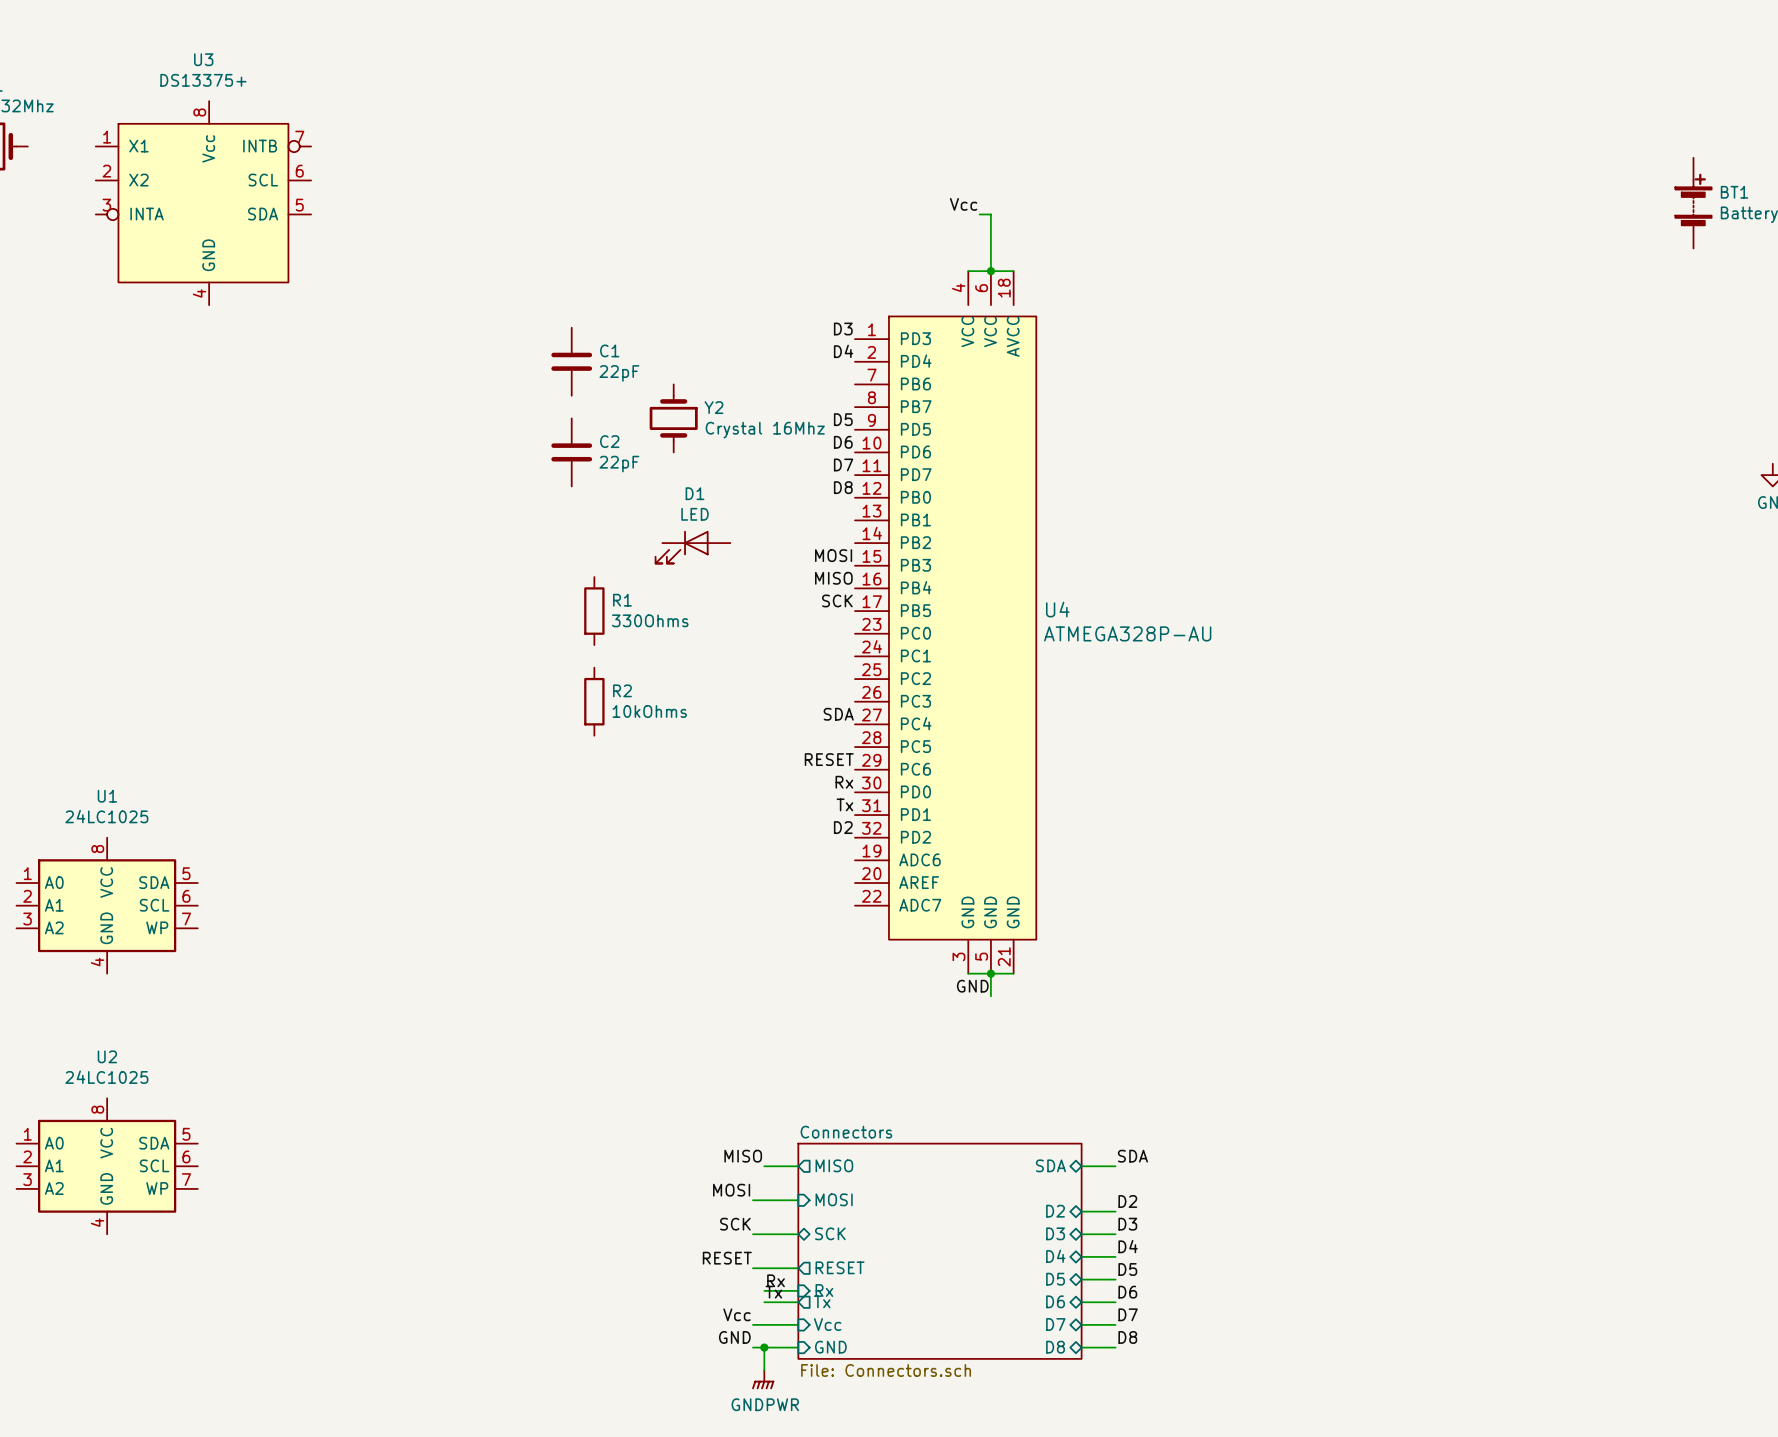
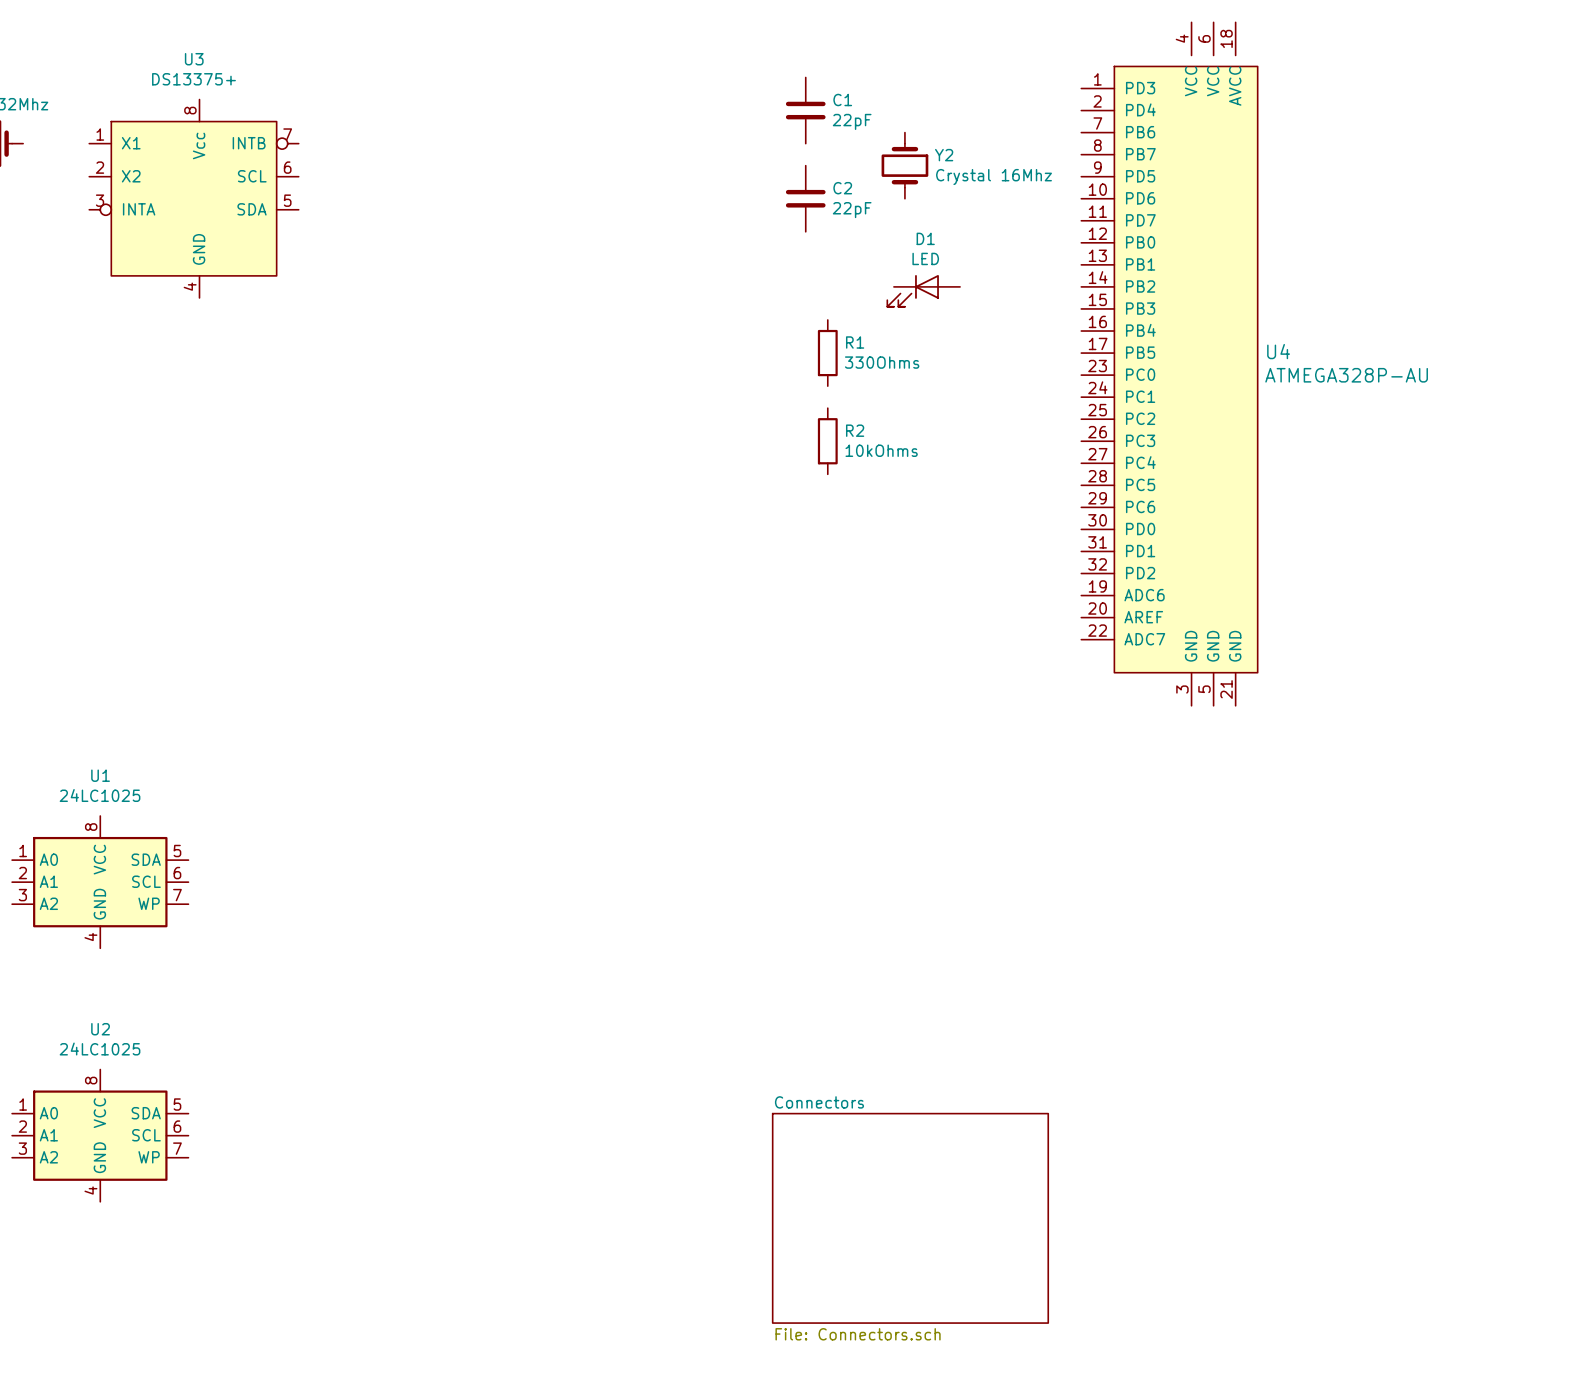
label: Vcc (963, 204) -> none
wire: (979, 214) (990, 214) (990, 271) -> none
wire: (968, 271) (1013, 271) -> none
junction: (990, 271) -> none
label: D3 (843, 329) -> none
label: D4 (843, 351) -> none
C1 position: (571, 361) -> (805, 110)
Y2 position: (673, 418) -> (904, 165)
label: D5 (843, 419) -> none
label: D6 (843, 442) -> none
C2 position: (571, 452) -> (805, 198)
label: D7 (843, 464) -> none
label: D8 (843, 487) -> none
D1 position: (692, 547) -> (923, 290)
label: MOSI (833, 555) -> none
label: MISO (833, 578) -> none
label: SCK (837, 600) -> none
R1 position: (594, 611) -> (827, 353)
U4 position: (945, 622) -> (1169, 364)
R2 position: (594, 701) -> (827, 441)
label: SDA (838, 714) -> none
label: RESET (829, 759) -> none
label: Rx (844, 782) -> none
label: Tx (844, 804) -> none
label: D2 (843, 827) -> none
wire: (968, 973) (1013, 973) -> none
wire: (990, 973) (990, 996) -> none
junction: (990, 973) -> none
label: GND (972, 986) -> none
label: MISO (743, 1156) -> none
label: SDA (1132, 1156) -> none
sheet pin: MISO (834, 1165) -> none
sheet pin: SDA (1050, 1165) -> none
wire: (764, 1166) (798, 1166) -> none
wire: (1081, 1166) (1115, 1166) -> none
label: MOSI (731, 1190) -> none
sheet pin: MOSI (834, 1199) -> none
wire: (753, 1200) (798, 1200) -> none
label: D2 (1127, 1201) -> none
sheet pin: D2 (1055, 1211) -> none
wire: (1081, 1211) (1115, 1211) -> none
label: SCK (735, 1224) -> none
label: D3 (1127, 1224) -> none
sheet pin: SCK (830, 1233) -> none
sheet pin: D3 (1055, 1233) -> none
wire: (753, 1234) (798, 1234) -> none
wire: (1081, 1234) (1115, 1234) -> none
label: D4 (1128, 1246) -> none
sheet pin: D4 (1055, 1256) -> none
wire: (1081, 1256) (1115, 1256) -> none
label: RESET (727, 1258) -> none
sheet pin: RESET (840, 1267) -> none
wire: (753, 1268) (798, 1268) -> none
label: D5 (1127, 1269) -> none
sheet pin: D5 (1055, 1279) -> none
wire: (1081, 1279) (1115, 1279) -> none
label: Rx (776, 1280) -> none
wire: (764, 1290) (798, 1290) -> none
sheet pin: Rx (824, 1290) -> none
label: Tx (773, 1292) -> none
label: D6 (1127, 1292) -> none
sheet pin: Tx (822, 1301) -> none
sheet pin: D6 (1055, 1301) -> none
wire: (764, 1302) (798, 1302) -> none
wire: (1081, 1302) (1115, 1302) -> none
label: Vcc (737, 1314) -> none
label: D7 (1128, 1314) -> none
wire: (753, 1324) (798, 1324) -> none
sheet pin: Vcc (827, 1324) -> none
sheet pin: D7 (1055, 1324) -> none
wire: (1081, 1324) (1115, 1324) -> none
label: GND (734, 1337) -> none
label: D8 (1127, 1337) -> none
wire: (753, 1347) (798, 1347) -> none
wire: (764, 1347) (764, 1370) -> none
junction: (764, 1347) -> none
sheet pin: GND (830, 1347) -> none
sheet pin: D8 (1055, 1347) -> none
wire: (1081, 1347) (1115, 1347) -> none
power symbol: GNDPWR (763, 1379) -> none

